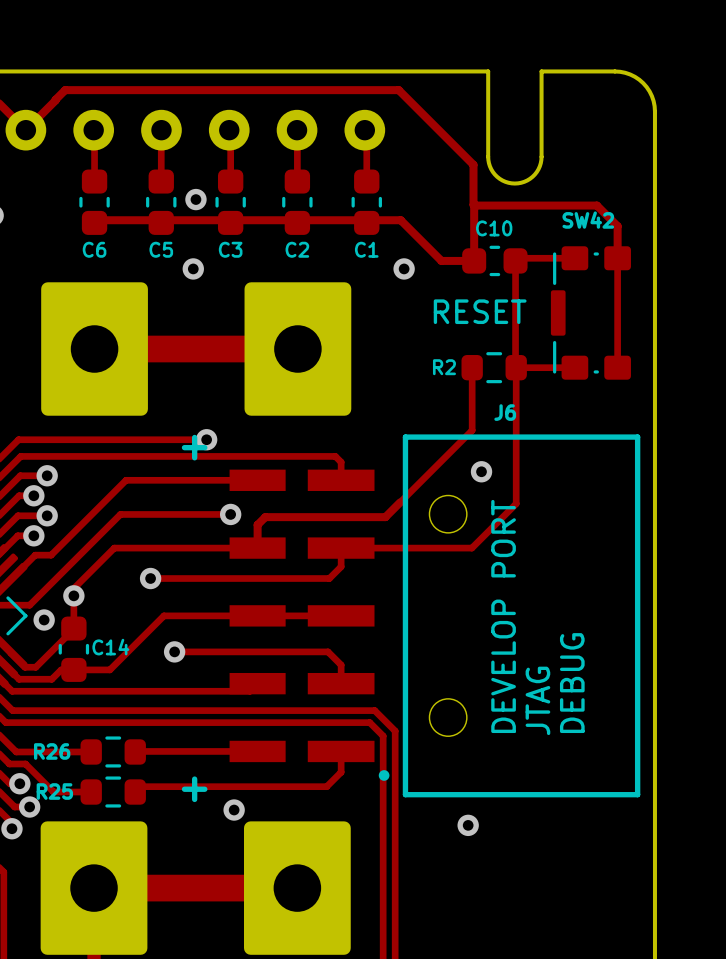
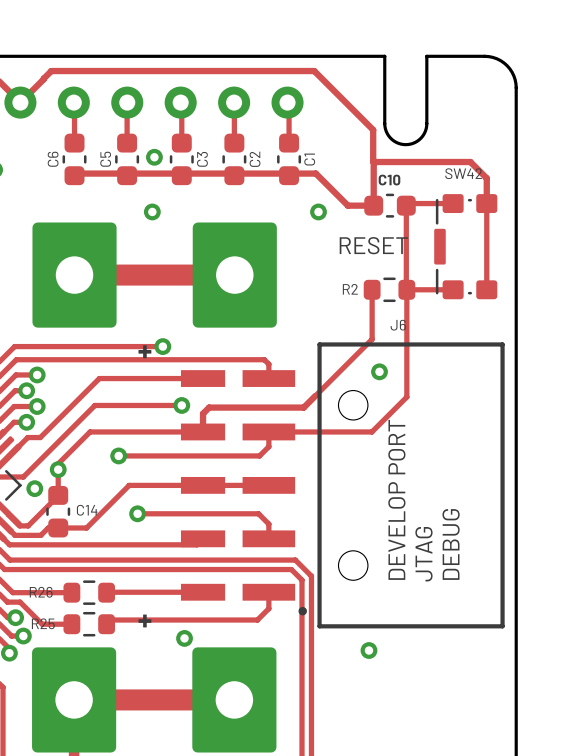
C6 name rotation: 0° (94, 249) -> 90° counterclockwise (53, 159)
C6 name position: C6 (94, 249) -> C6 (53, 159)
C5 name rotation: 0° (161, 249) -> 90° counterclockwise (105, 159)
C5 name position: C5 (161, 249) -> C5 (105, 159)
C3 name rotation: 0° (230, 249) -> 90° counterclockwise (202, 159)
C3 name position: C3 (230, 249) -> C3 (202, 159)
C2 name rotation: 0° (297, 249) -> 90° counterclockwise (255, 159)
C2 name position: C2 (297, 249) -> C2 (255, 159)
C1 name rotation: 0° (366, 249) -> 90° counterclockwise (309, 159)
C1 name position: C1 (366, 249) -> C1 (309, 159)

